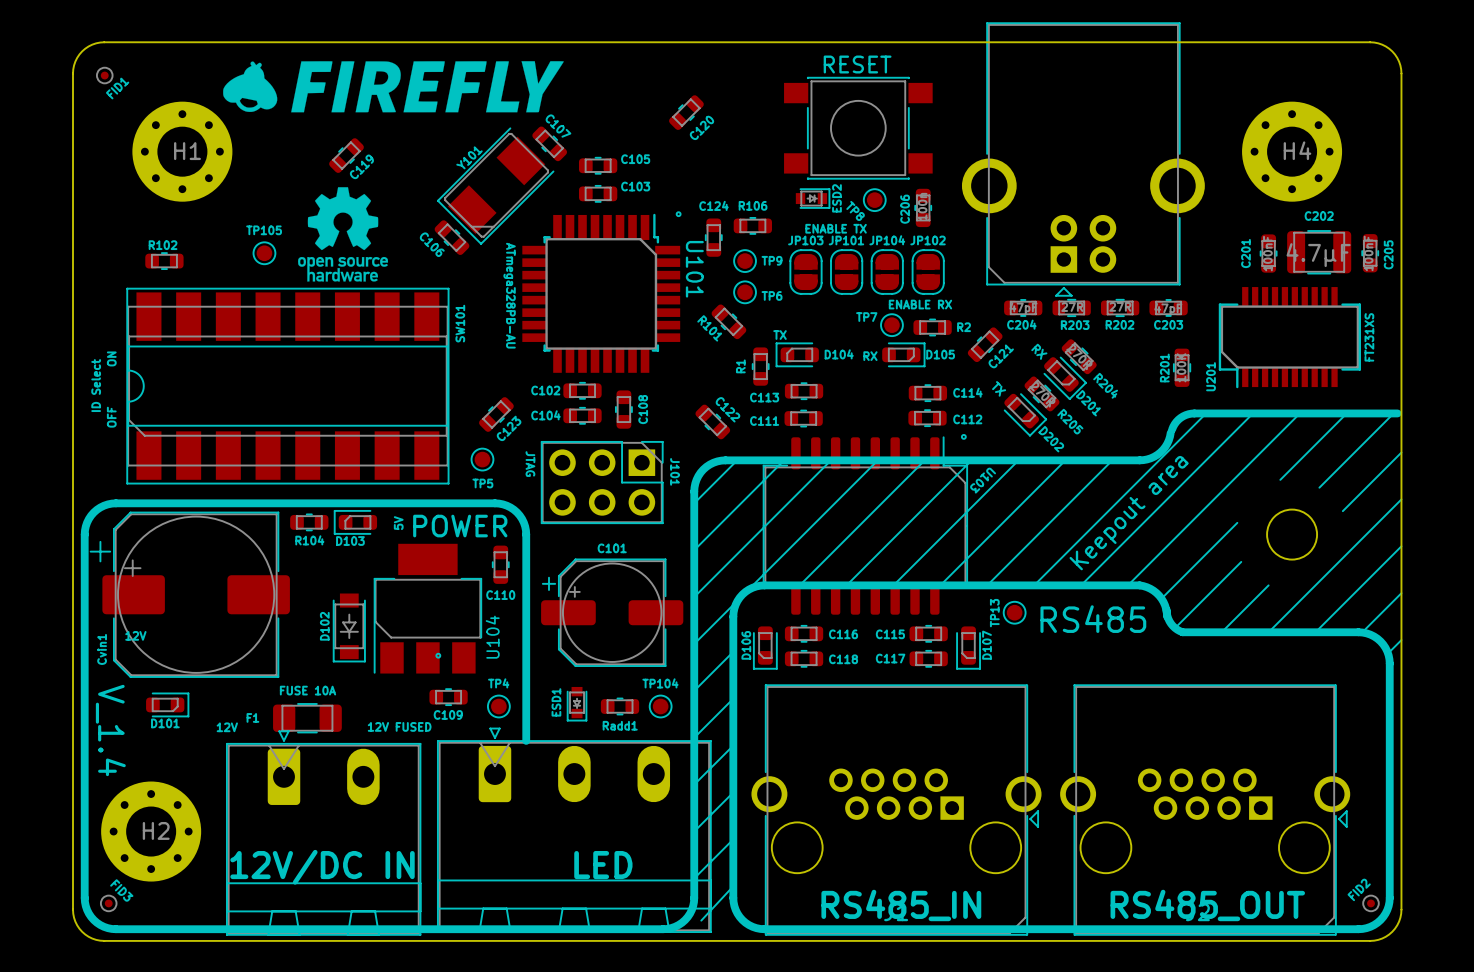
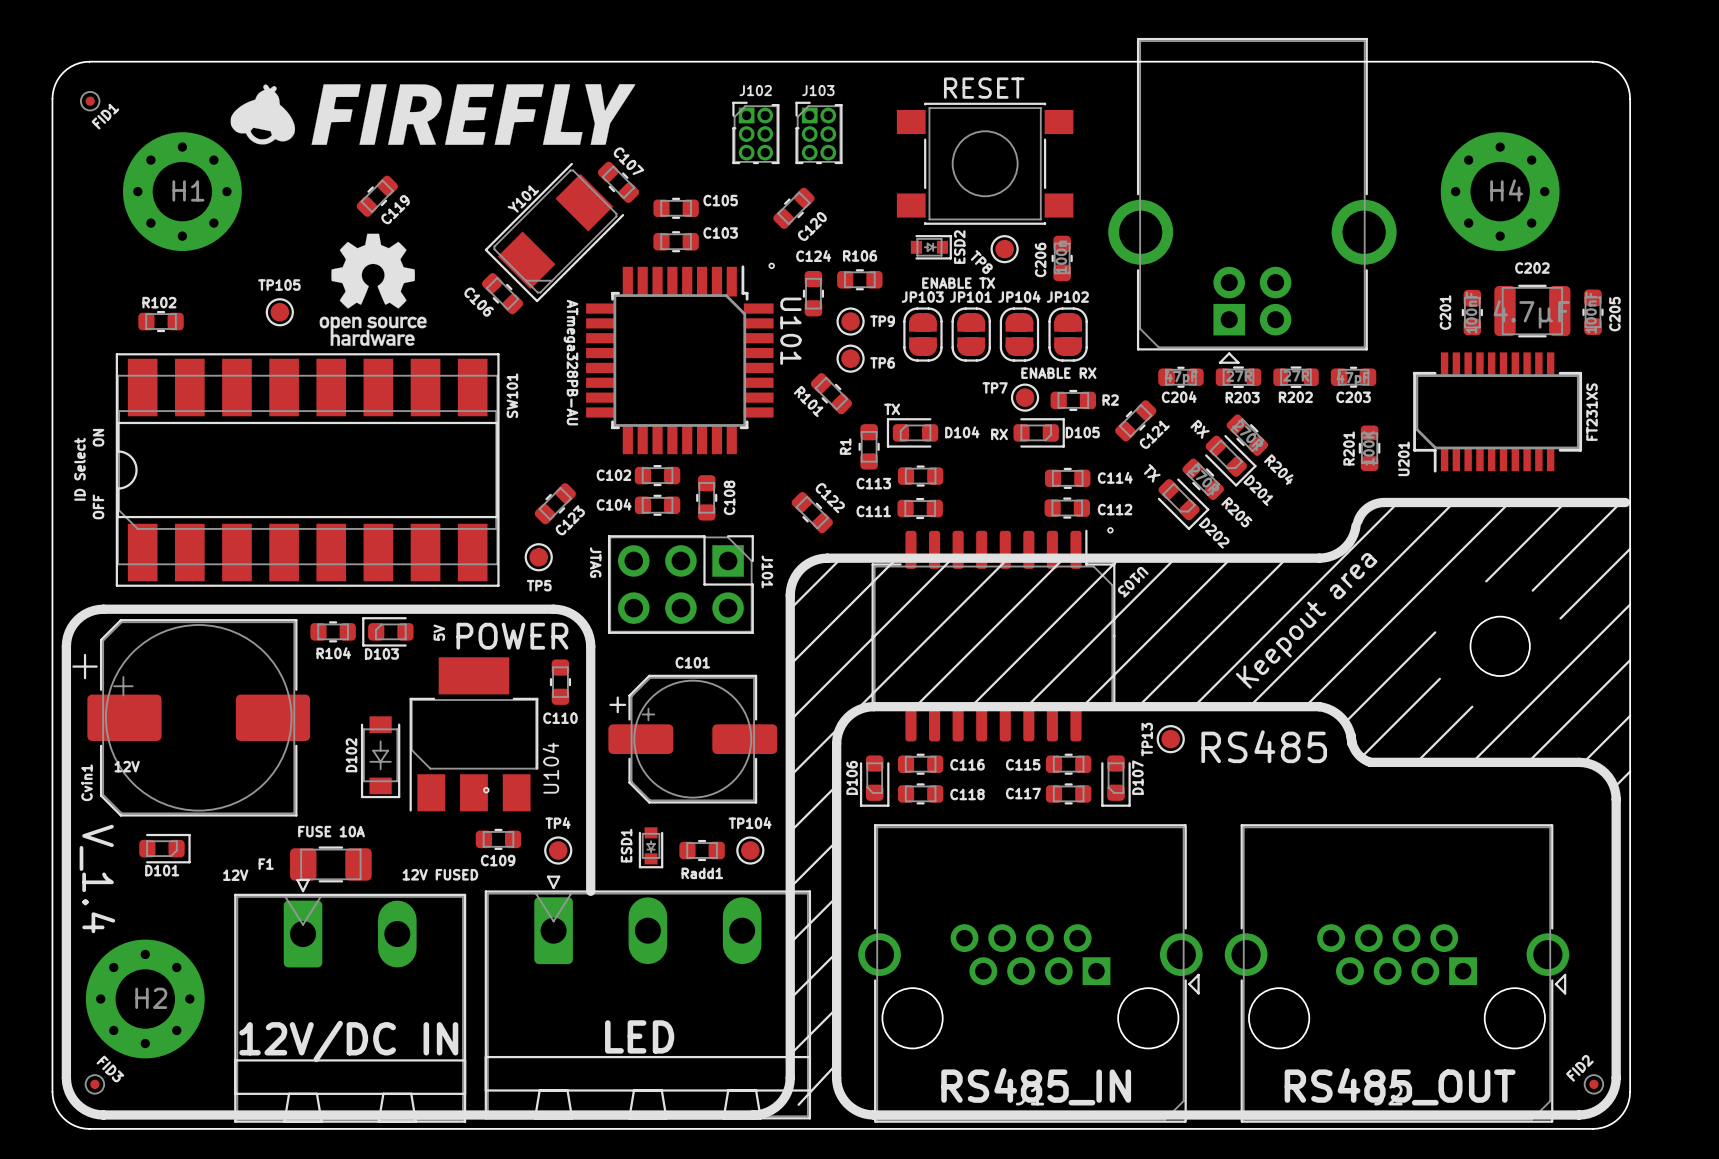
J102: none -> (755, 132)
J103: none -> (819, 132)
C120 position: (686, 112) -> (793, 208)
text position: LED (603, 865) -> LED (639, 1036)

